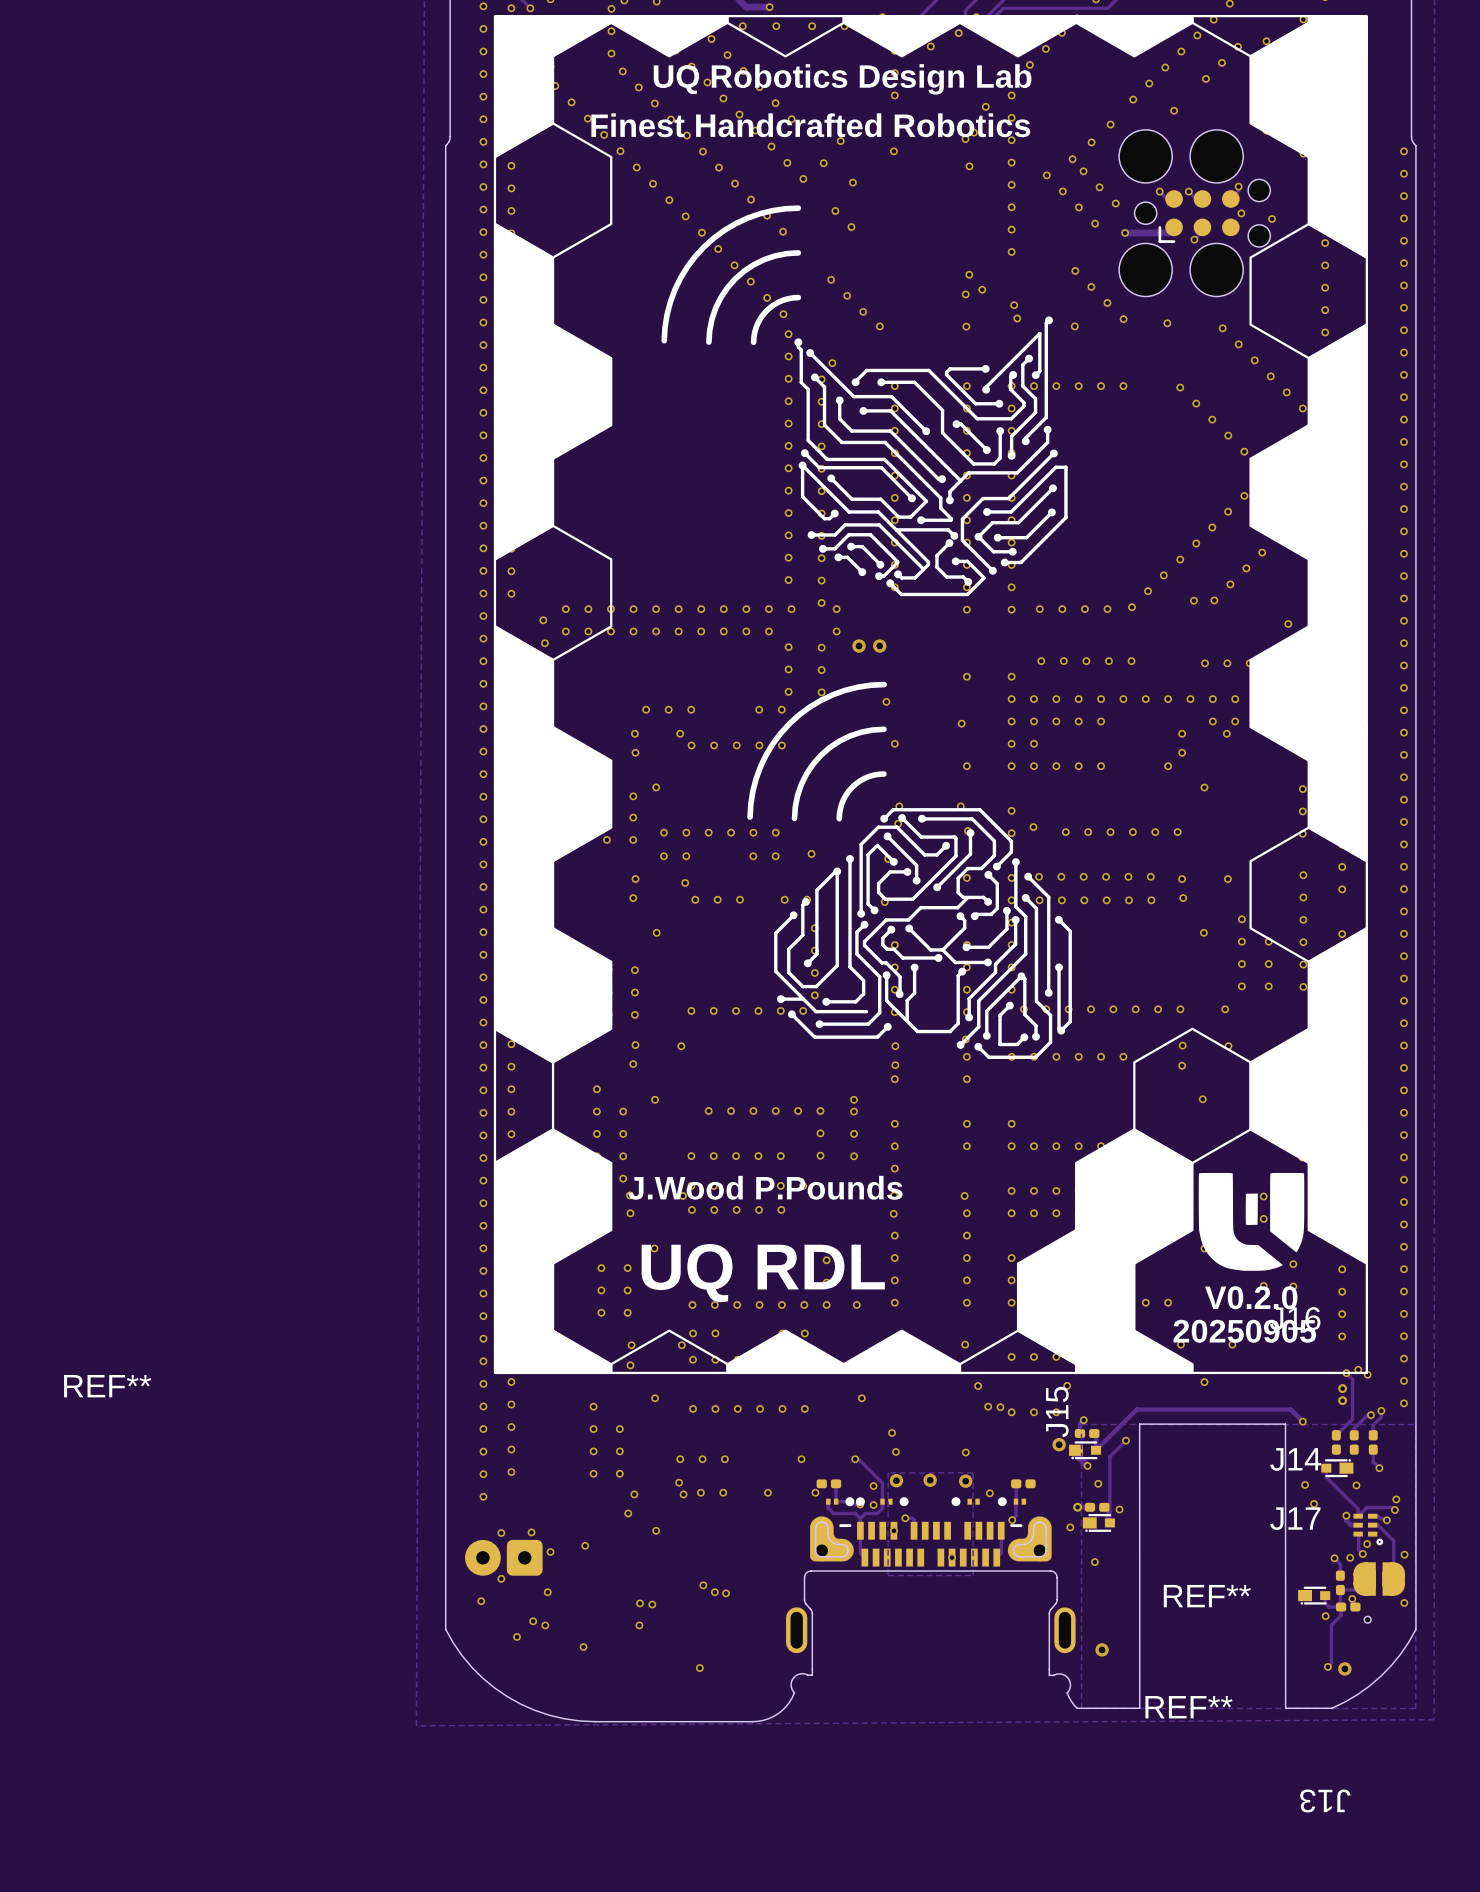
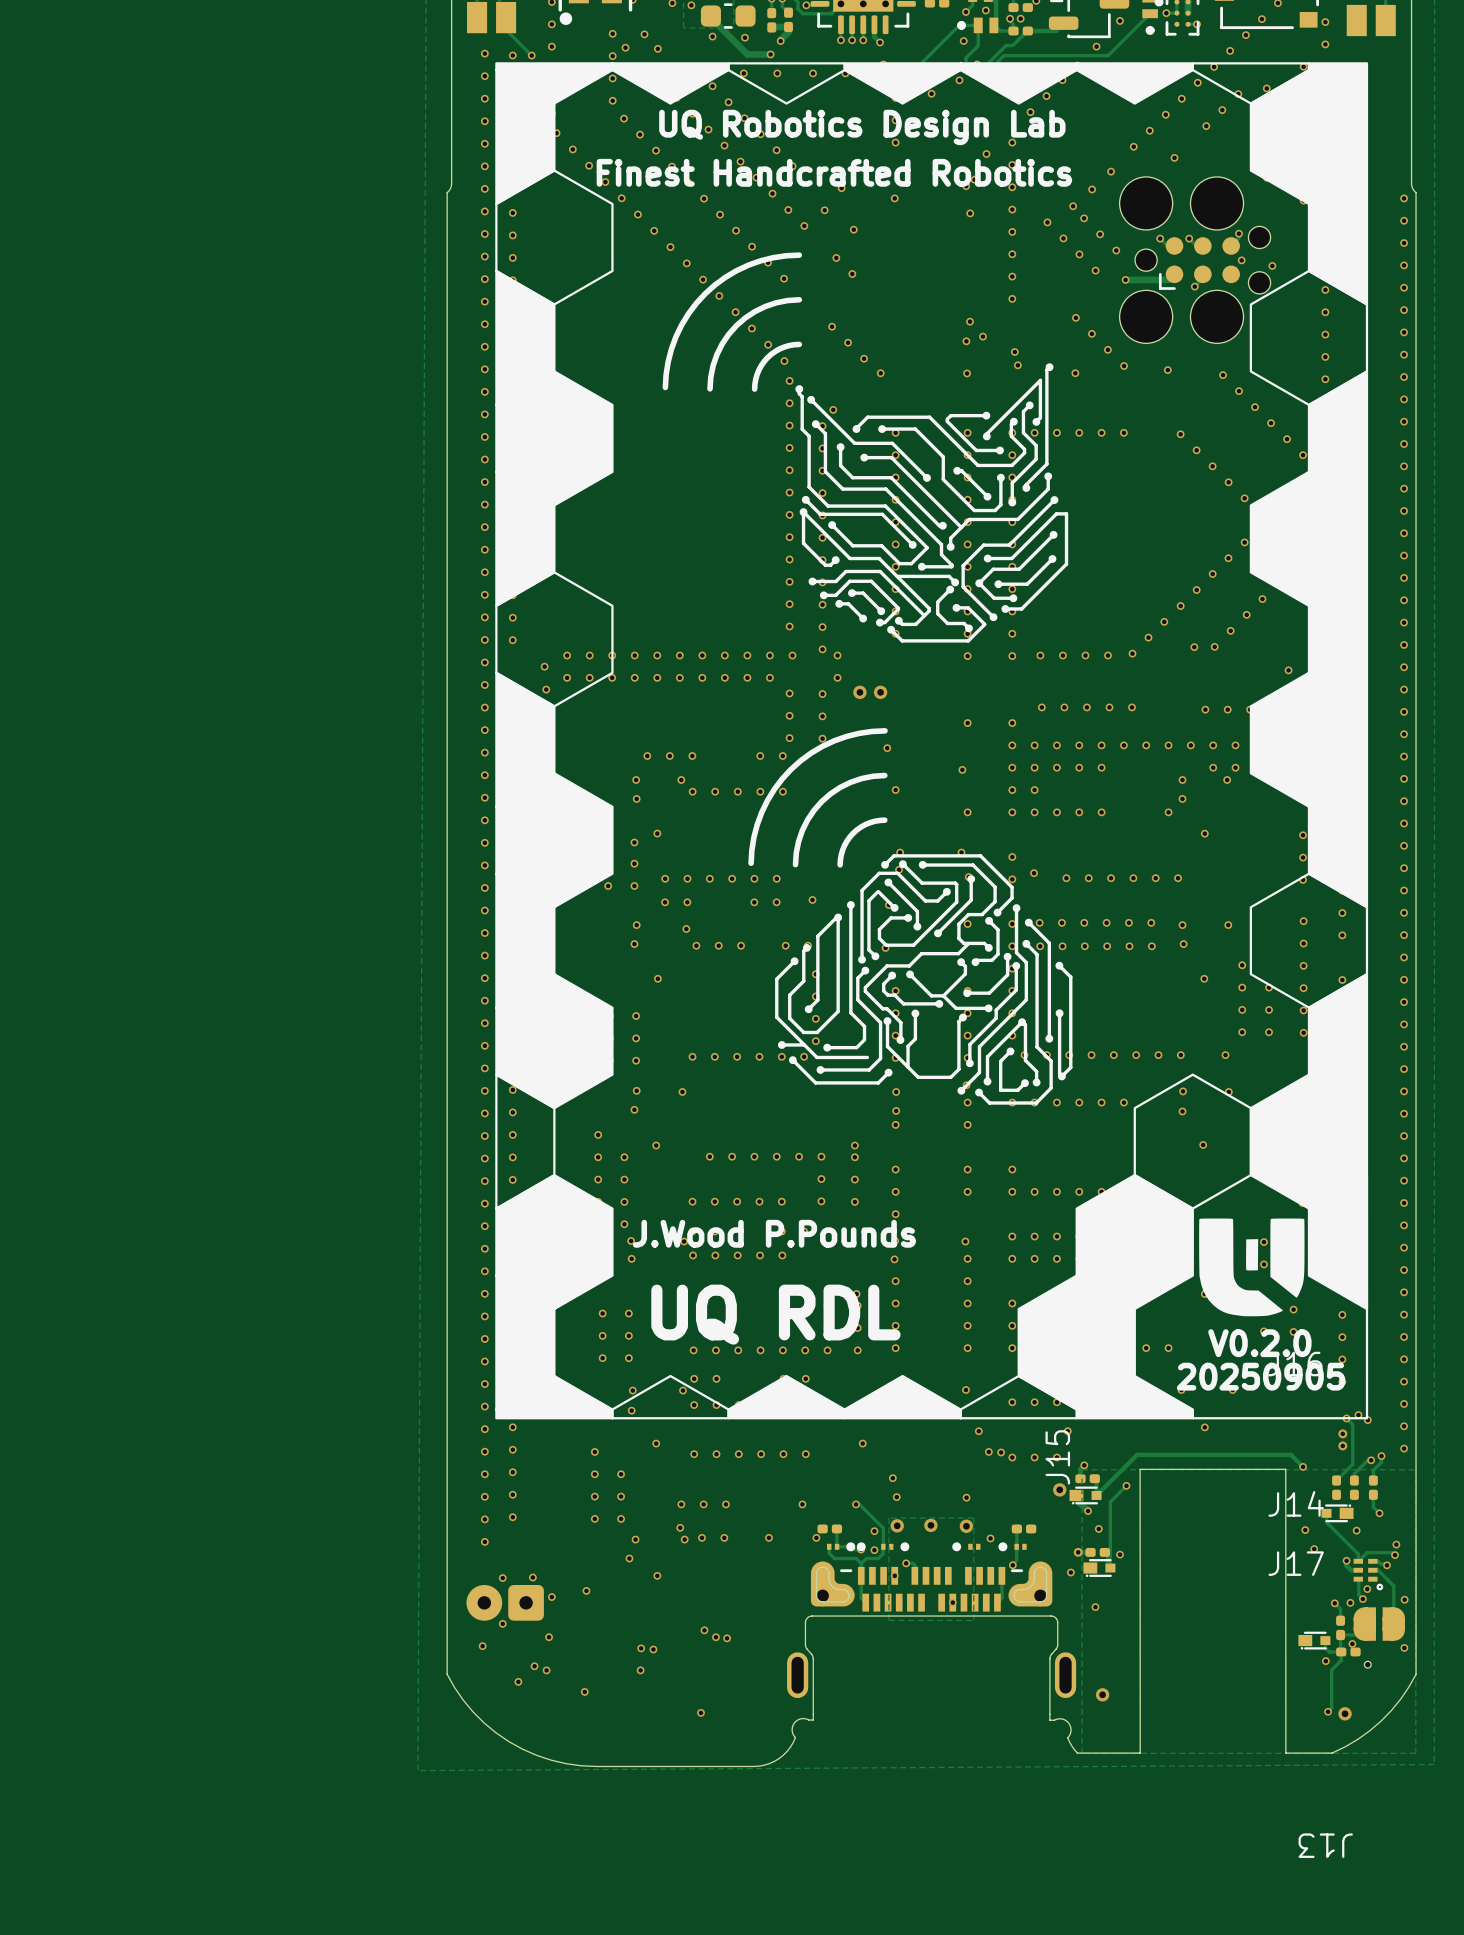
REF**: (107, 1386) -> none
REF**: (1207, 1596) -> none
REF**: (1189, 1707) -> none

